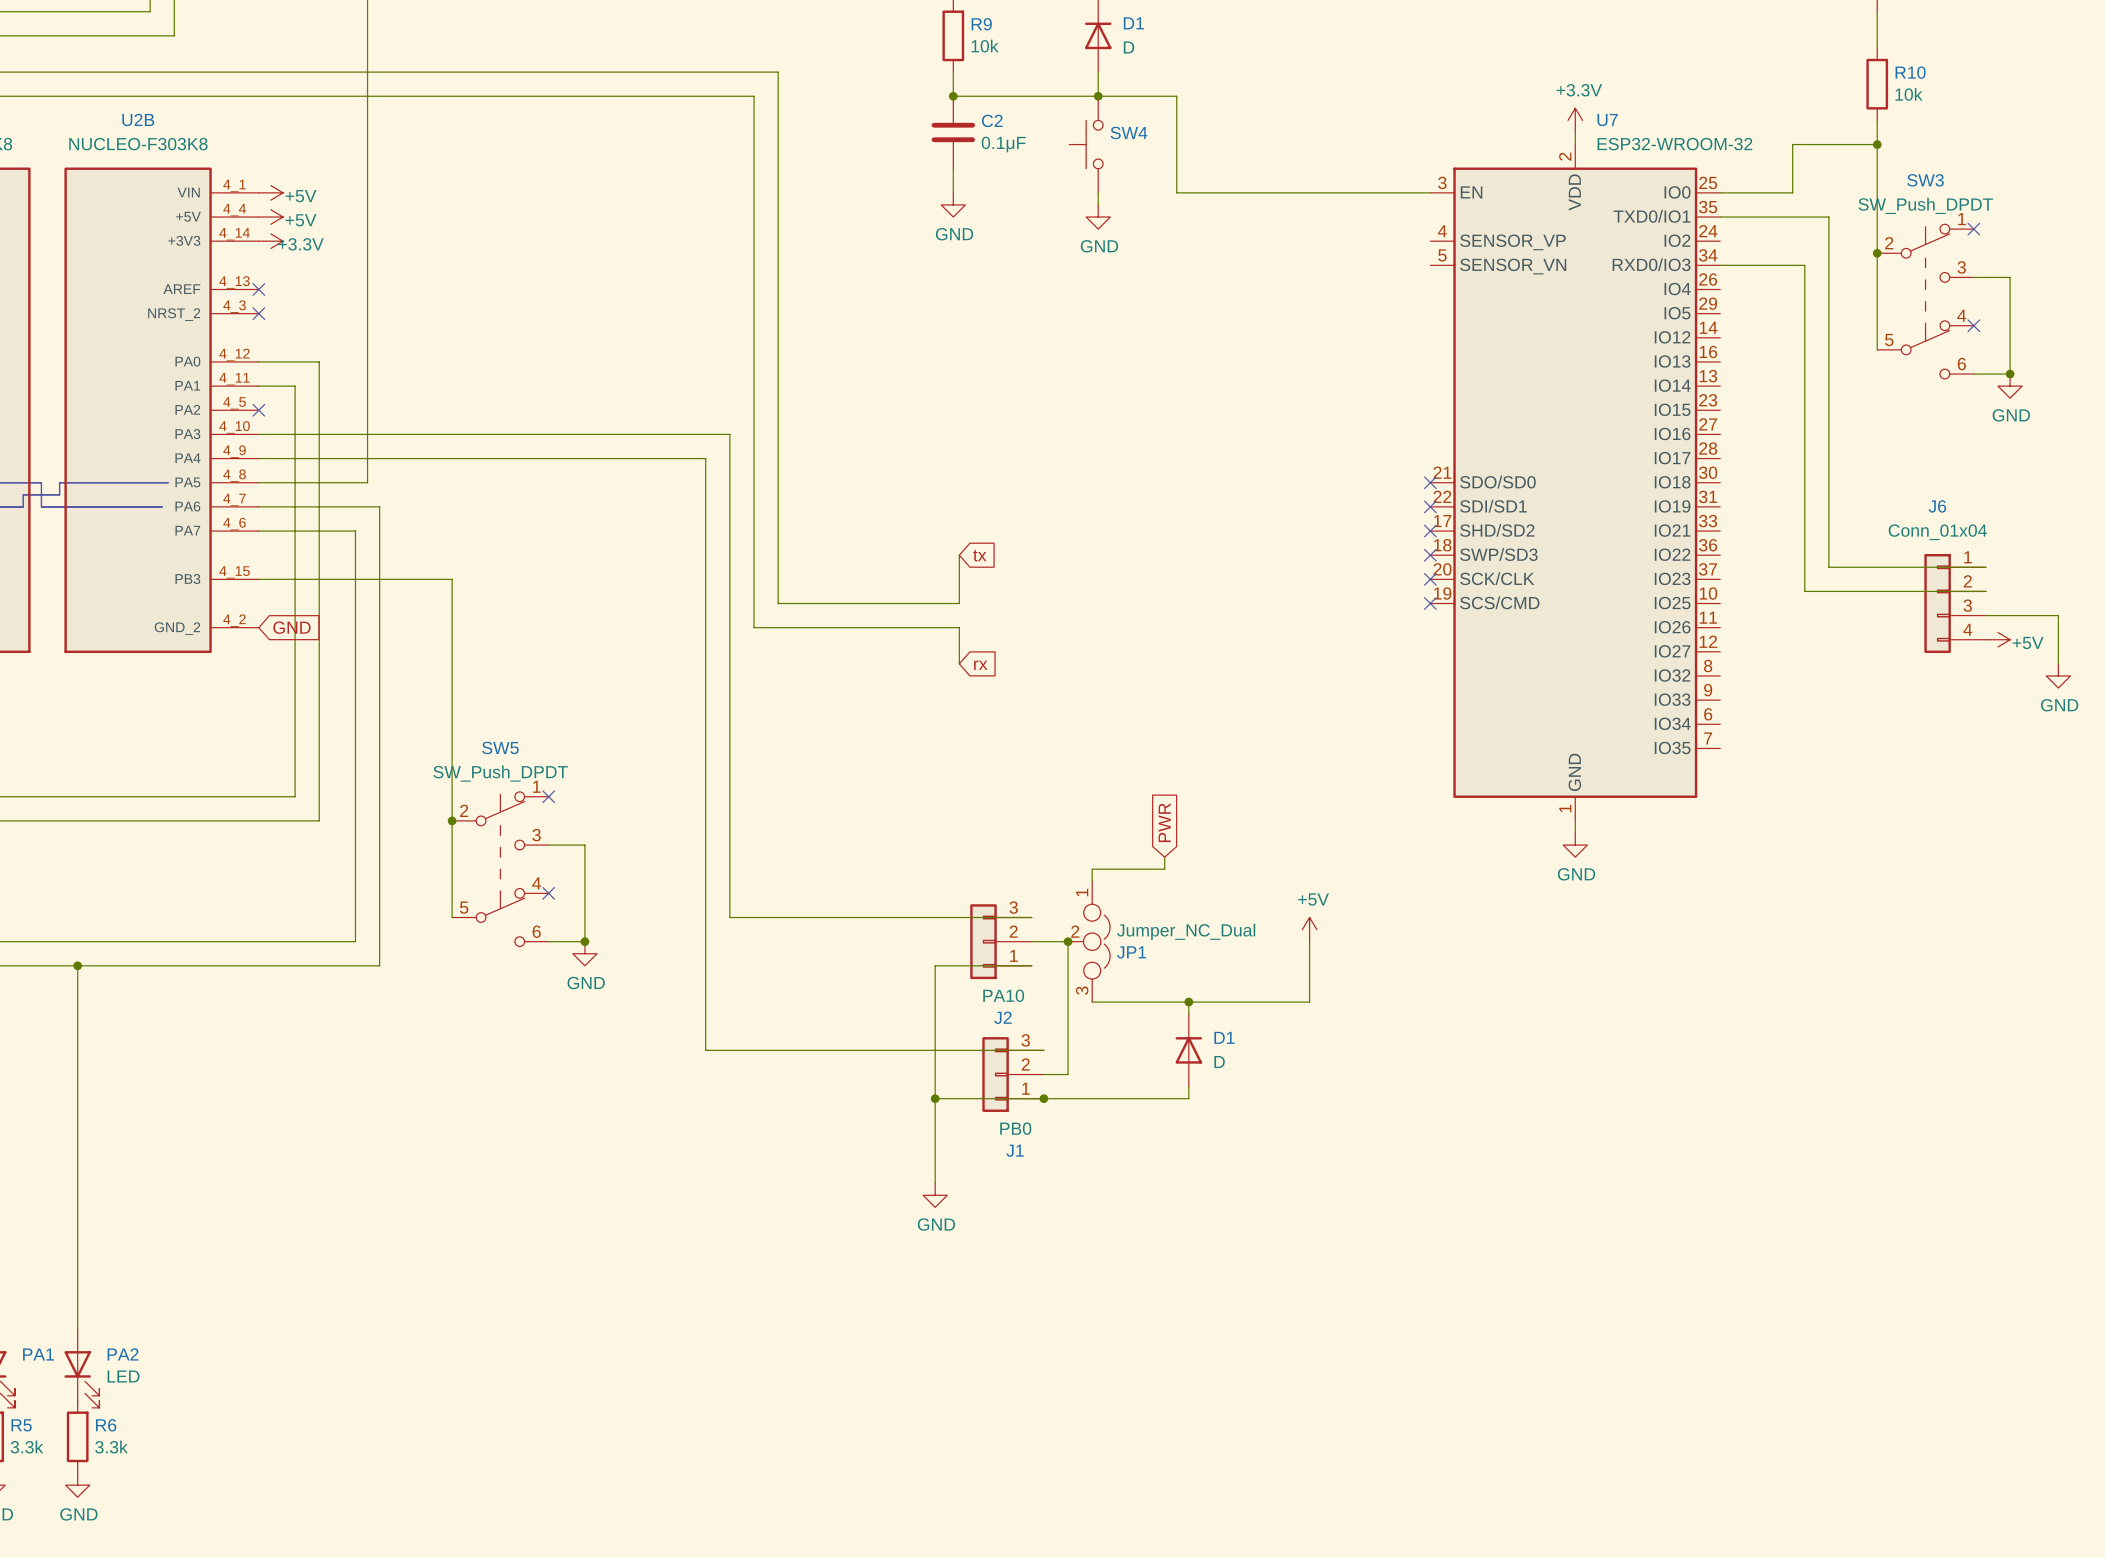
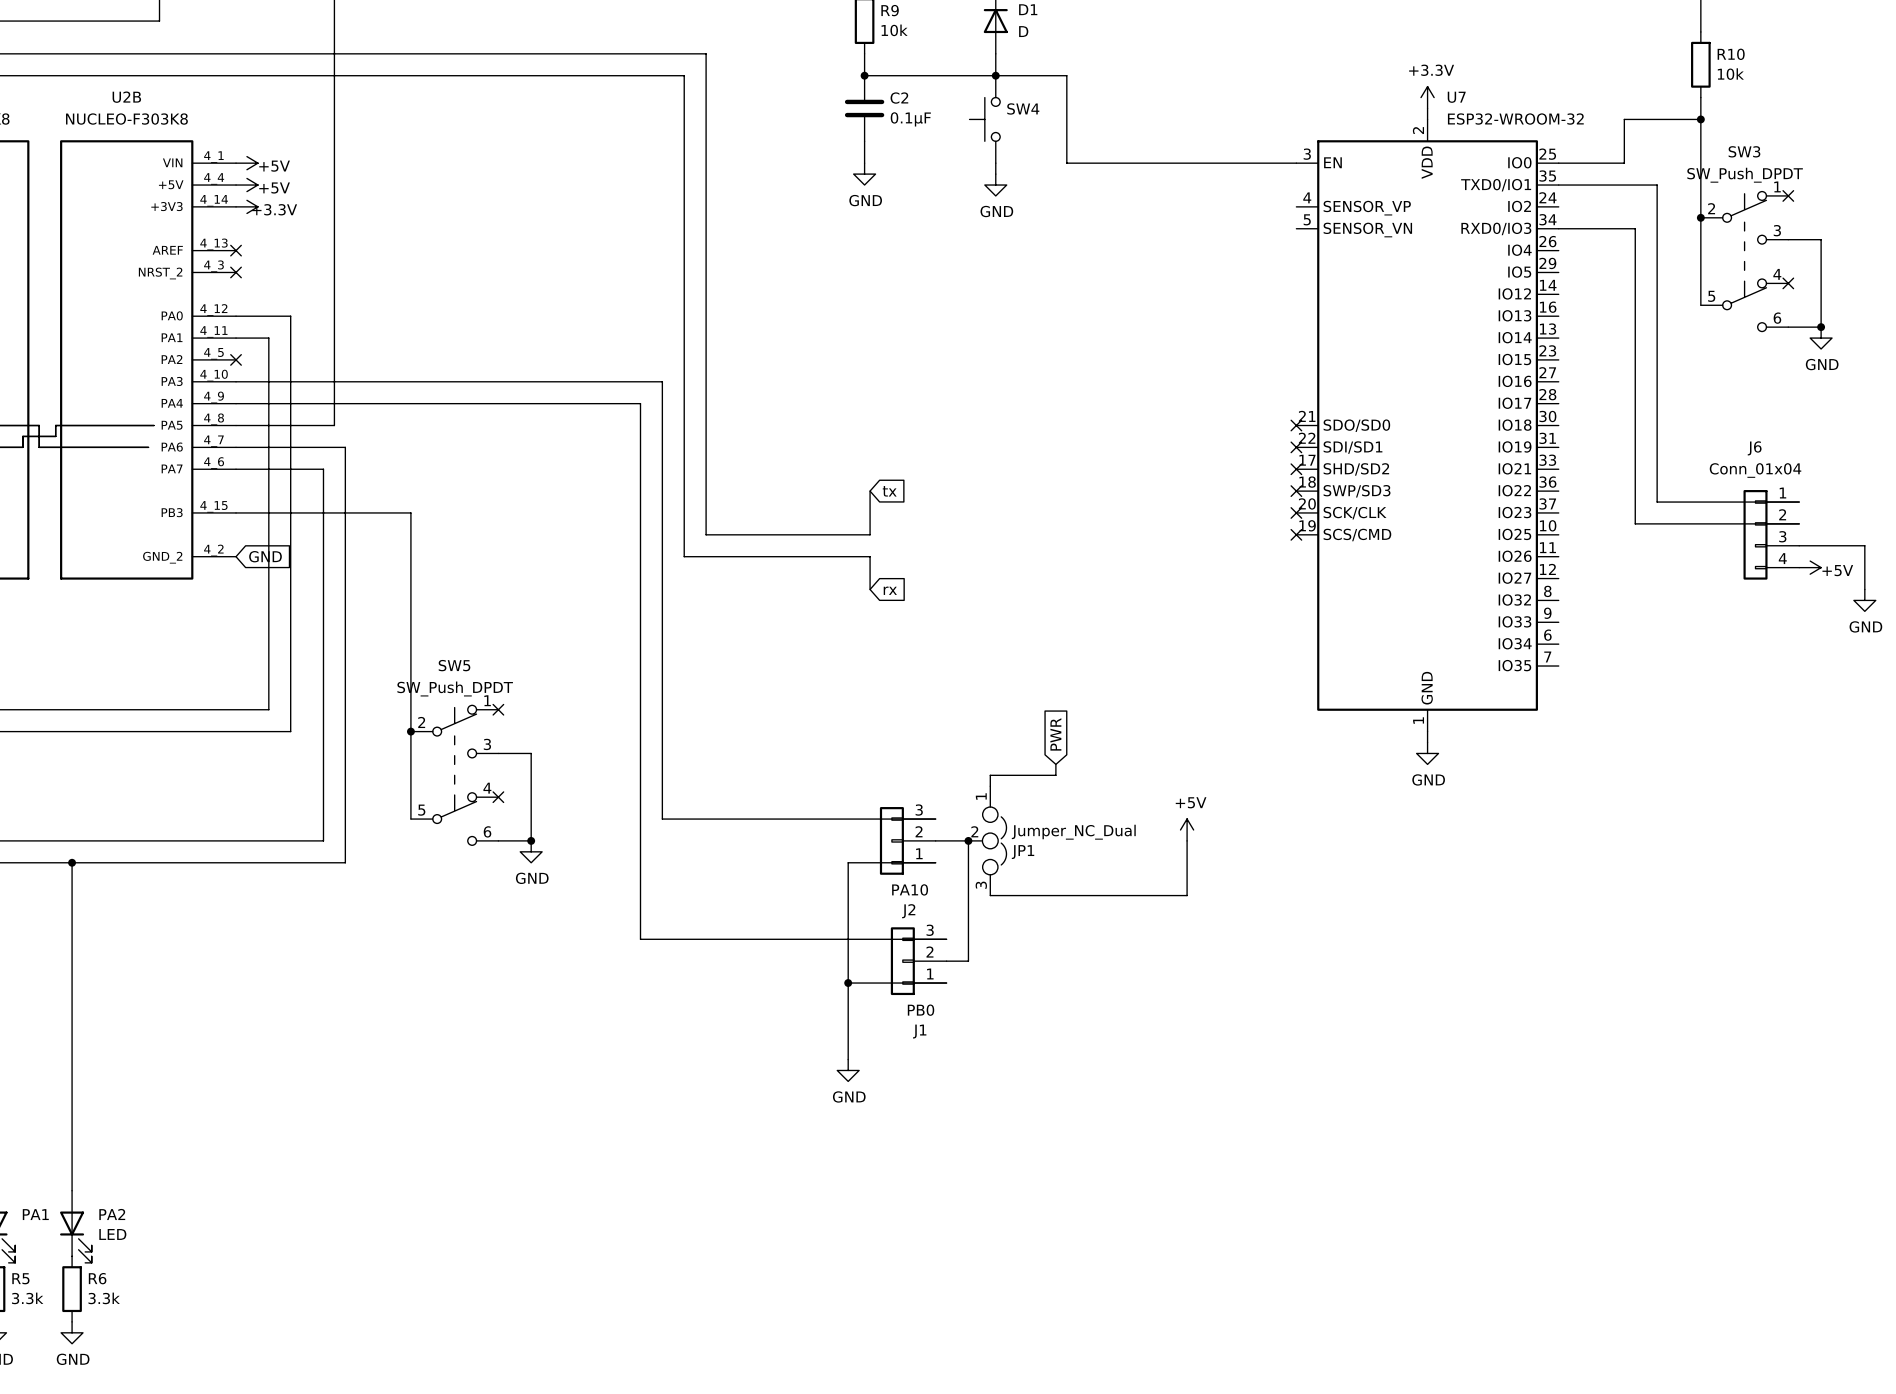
wire: (1188, 1002) (1188, 1014) -> none
junction: (1188, 1002) -> none
D1: D (1188, 1050) -> none
wire: (1188, 1086) (1188, 1098) (1043, 1098) -> none
junction: (1043, 1098) -> none

